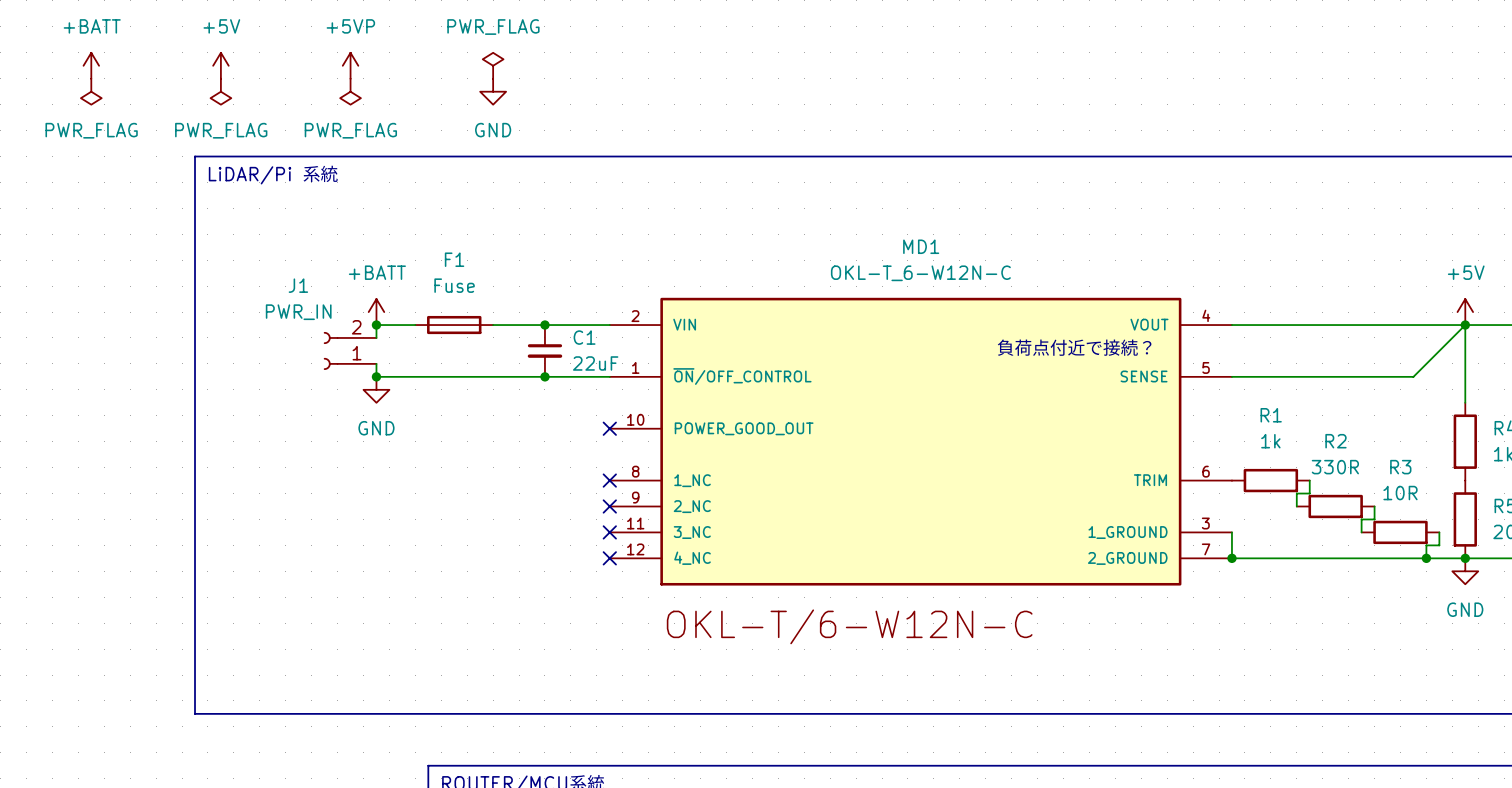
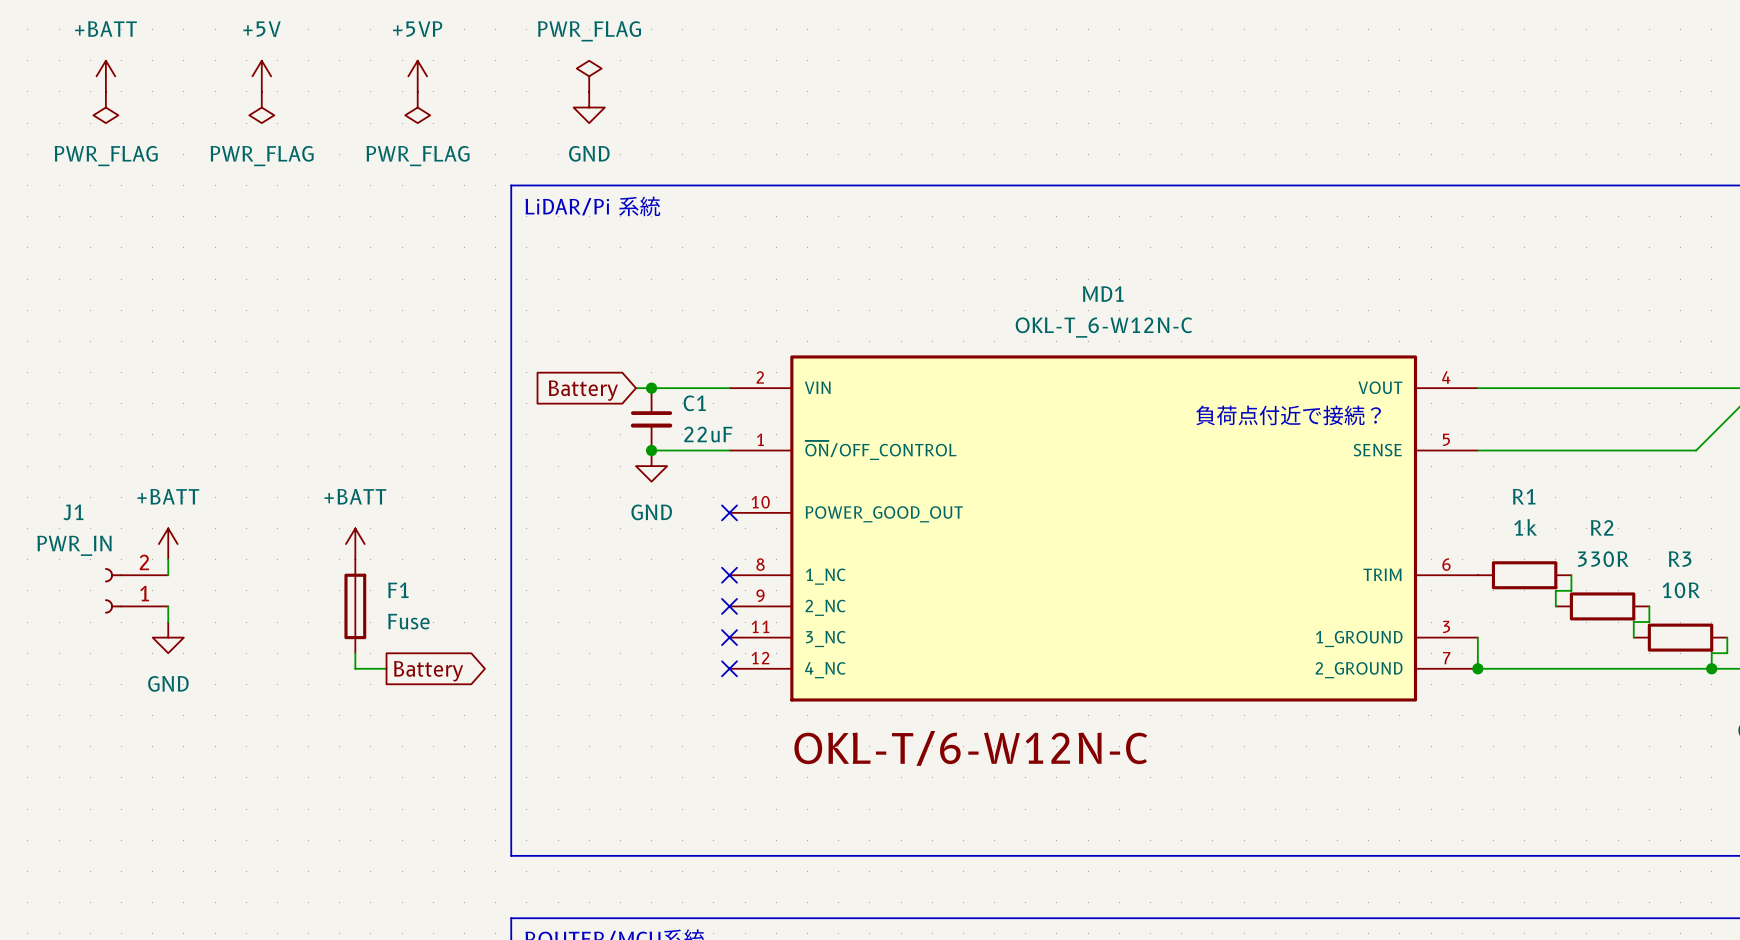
line: (428, 156) (195, 156) (195, 713) (428, 713) -> (511, 185) (511, 855)
text position: LiDAR/Pi 系統 (273, 174) -> LiDAR/Pi 系統 (592, 206)
F1 name position: F1 (454, 259) -> F1 (398, 590)
power symbol: +BATT (376, 312) -> none
junction: (376, 325) -> none
wire: (415, 325) (376, 325) (376, 337) -> none
F1 rotation: 0° (454, 325) -> 90° clockwise (355, 606)
F1 position: (454, 325) -> (355, 606)
wire: (493, 325) (532, 325) -> none
global label: none -> Battery (583, 390)
J1 position: (350, 350) -> (136, 590)
wire: (376, 363) (376, 376) (544, 376) -> none
junction: (376, 376) -> none
power symbol: GND (376, 389) -> none
power symbol: none -> GND (651, 466)
power symbol: none -> +BATT (168, 544)
power symbol: none -> +BATT (355, 544)
wire: none -> (168, 559) (168, 575)
wire: none -> (168, 606) (168, 622)
power symbol: none -> GND (168, 637)
wire: none -> (355, 653) (355, 668) (386, 668)
global label: none -> Battery (428, 671)

